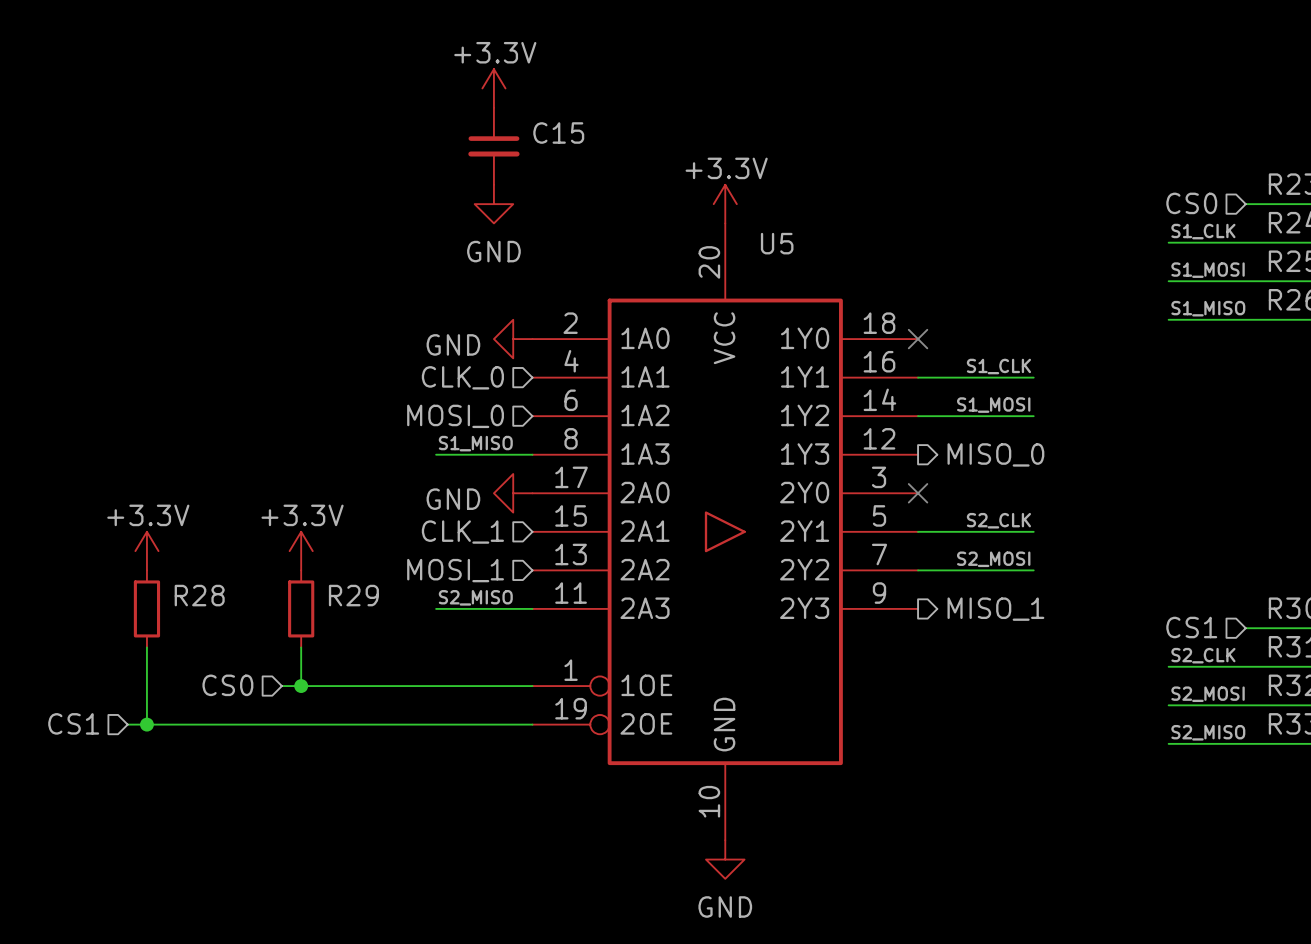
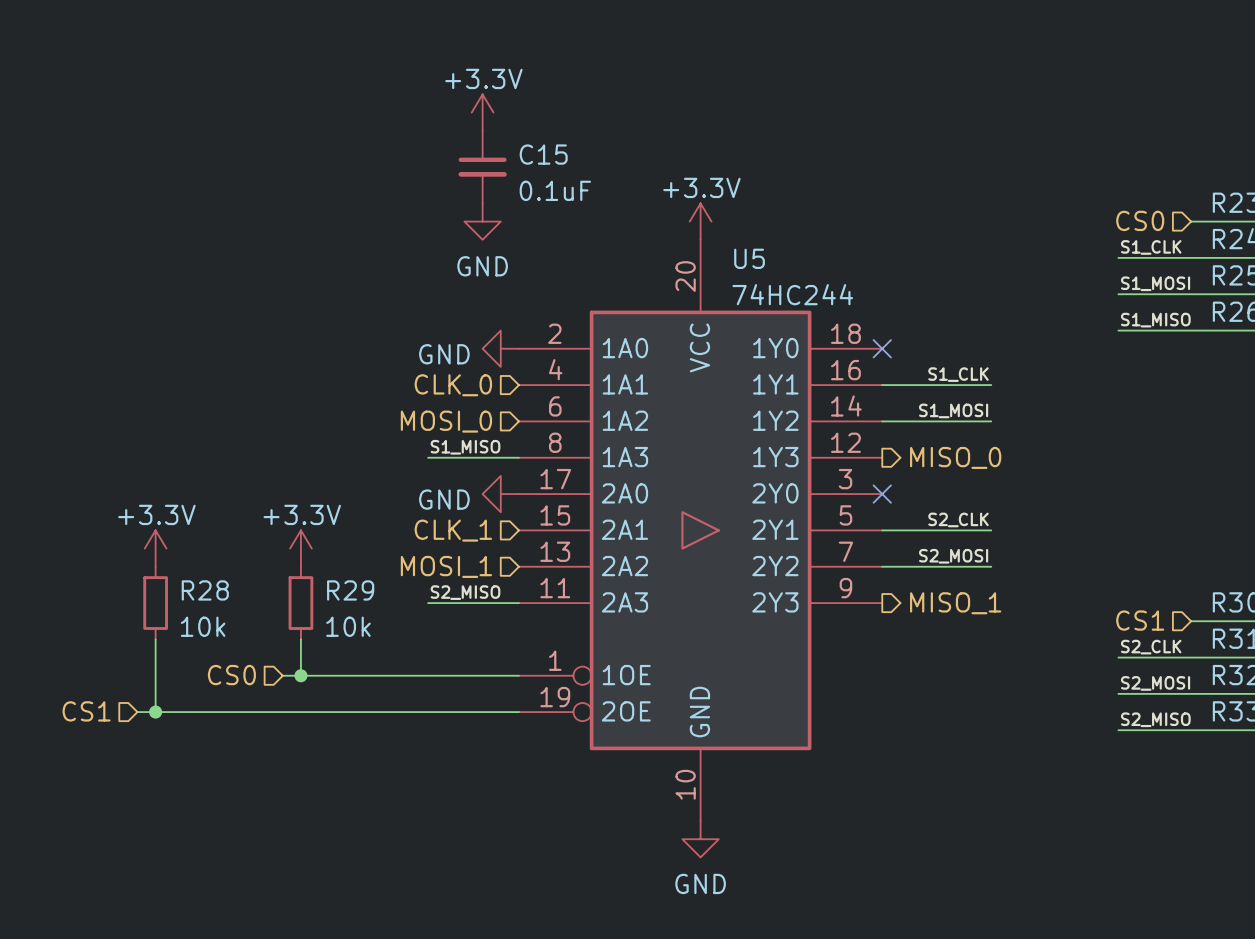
C15 value: none -> 0.1uF (555, 190)
U5 value: none -> 74HC244 (792, 294)
R28 value: none -> 10k (203, 626)
R29 value: none -> 10k (348, 626)

